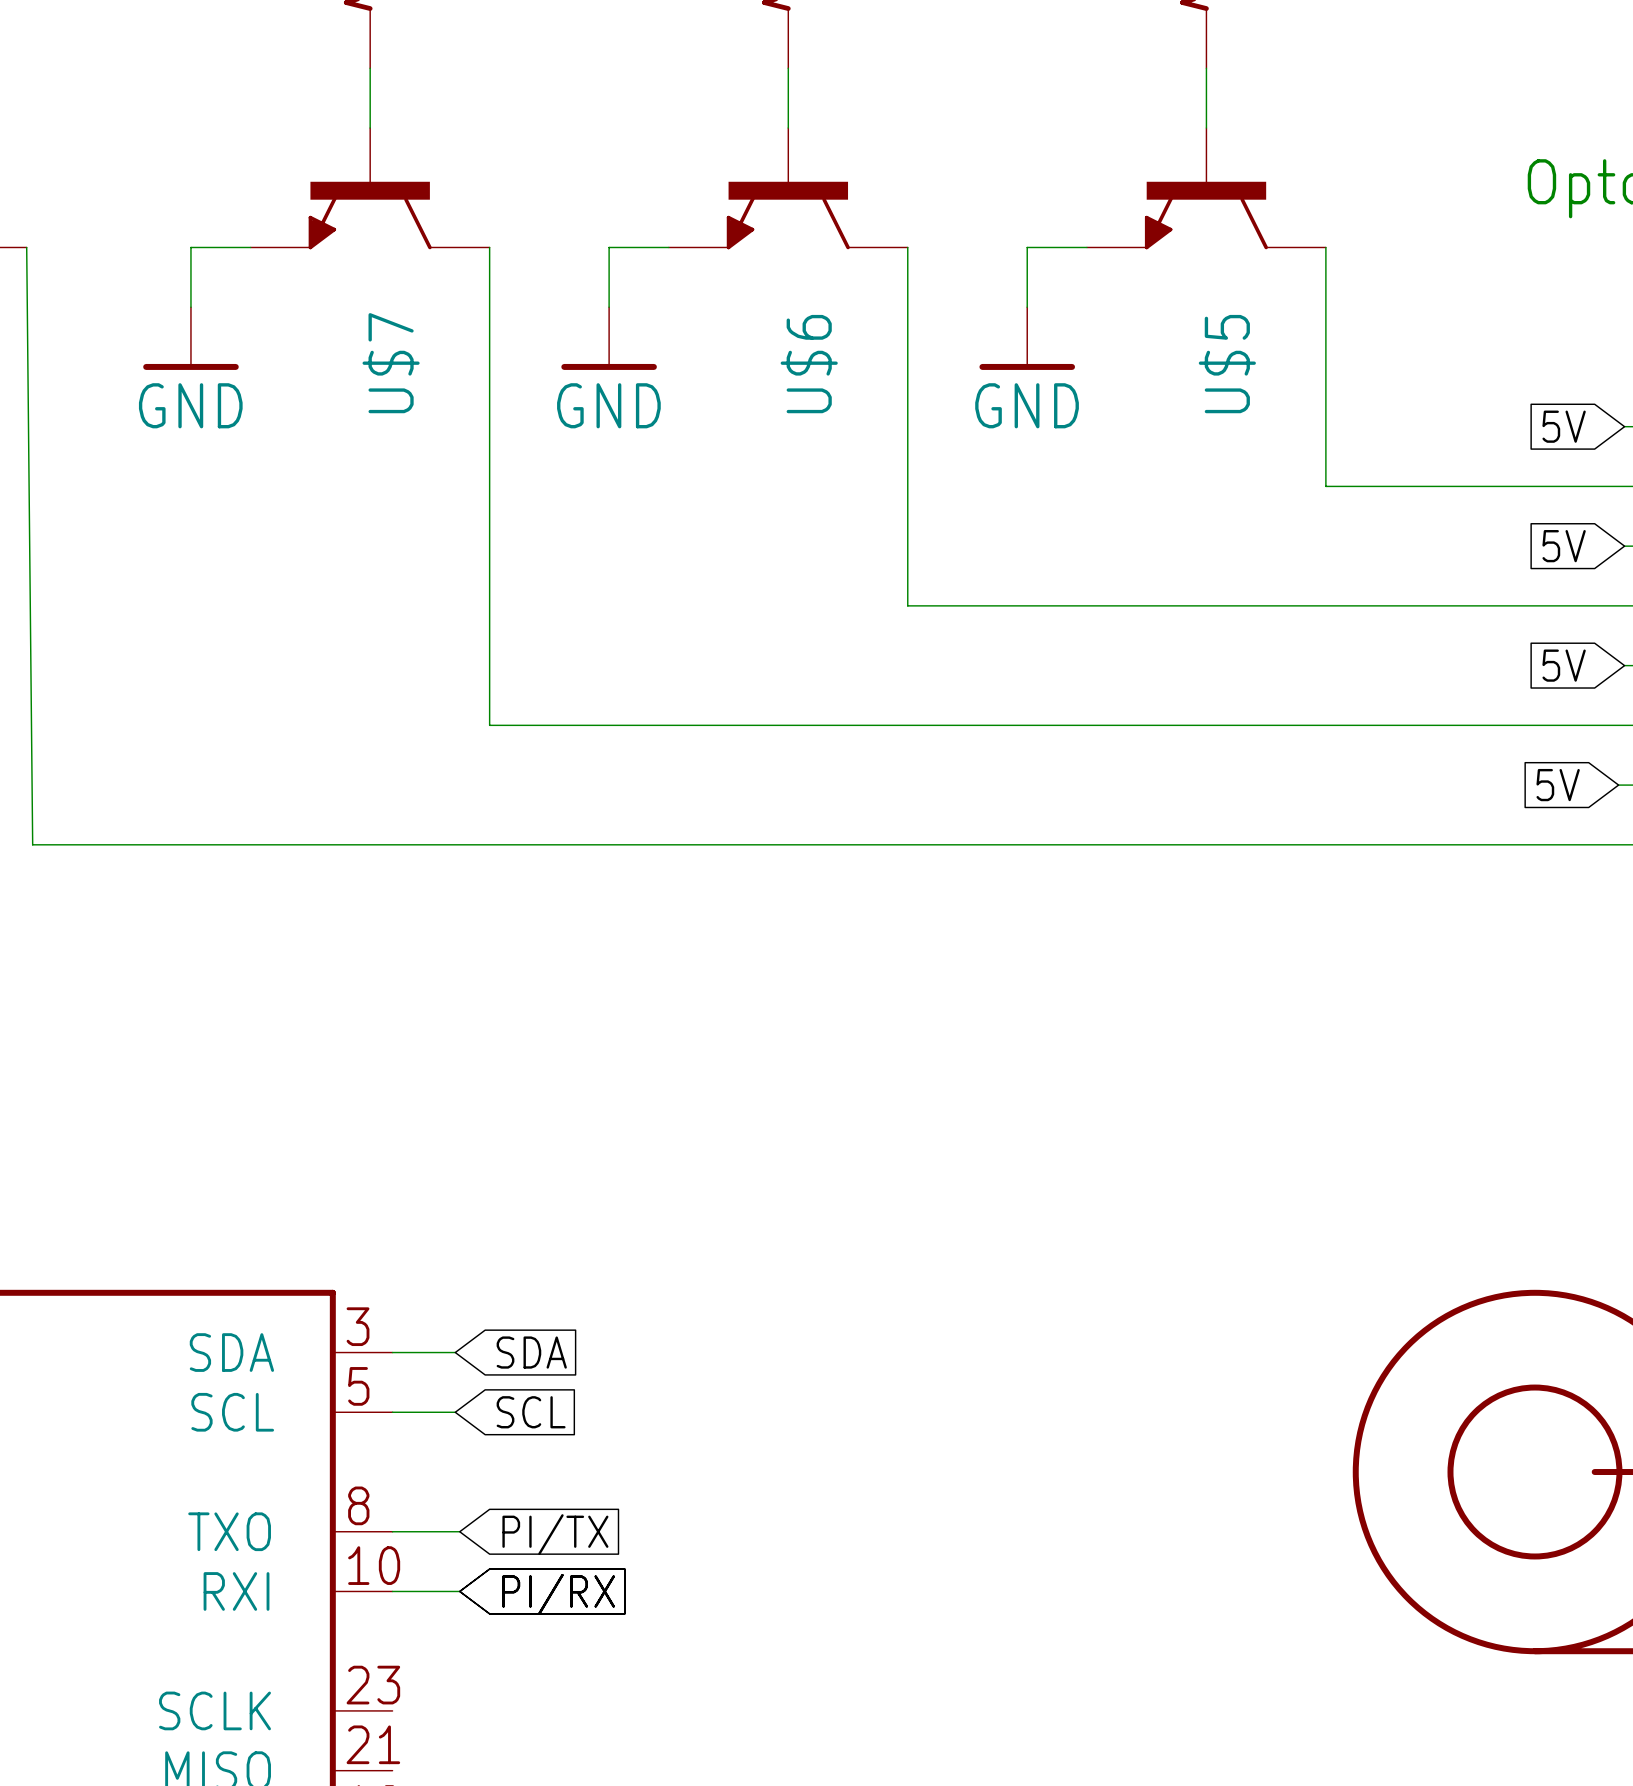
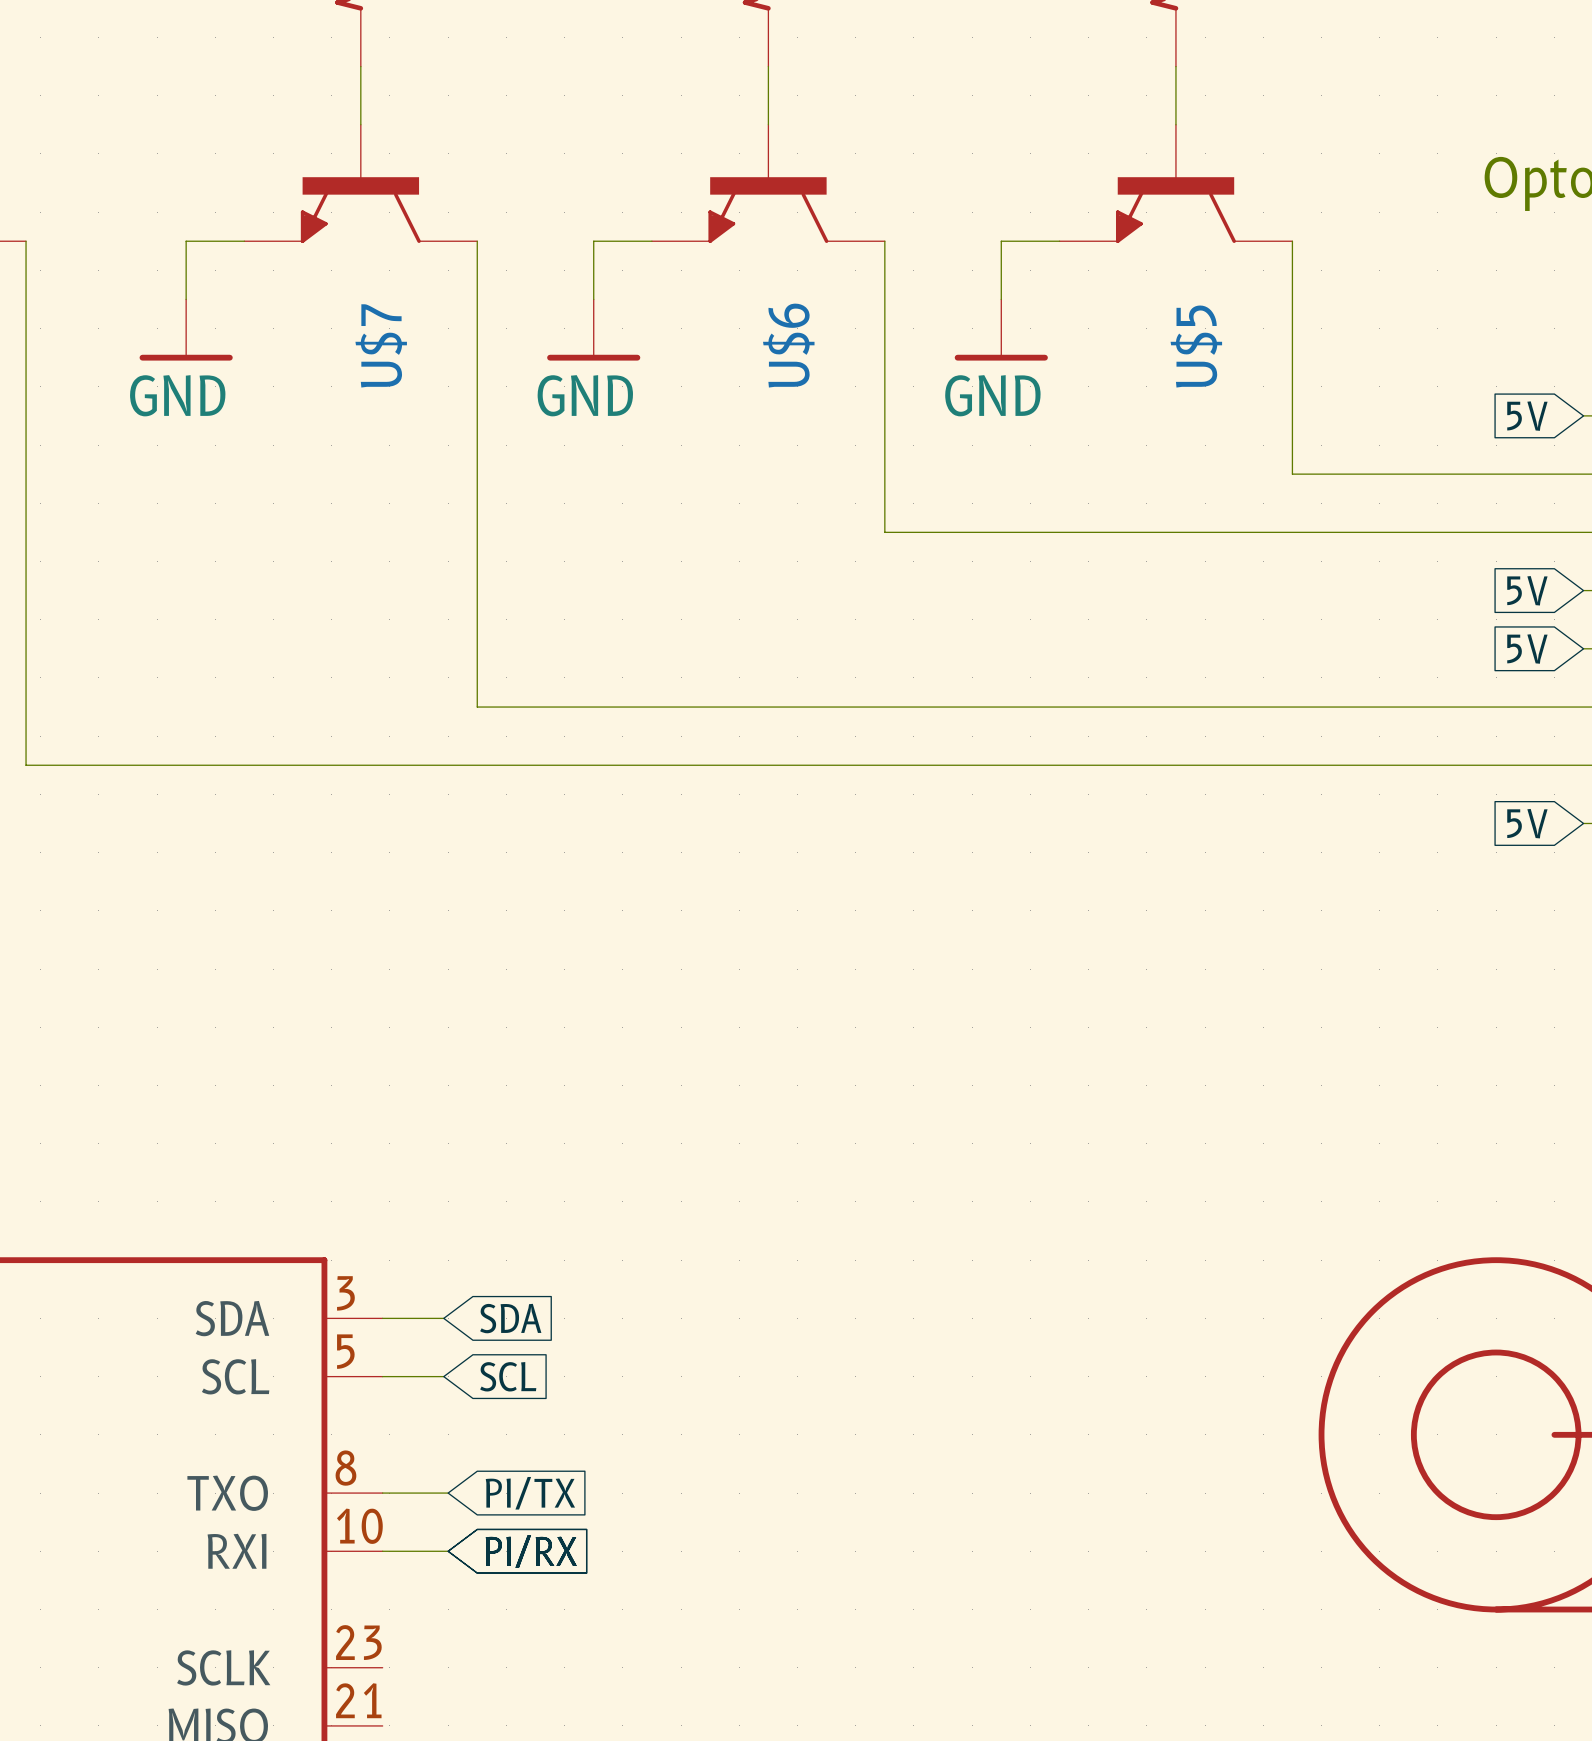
wire: (26, 247) (32, 844) (1624, 844) -> (26, 241) (26, 765) (1577, 765)
wire: (907, 546) (907, 605) (1624, 605) -> (884, 532) (1583, 532)
global label position: 5V (1564, 546) -> 5V (1527, 590)
global label position: 5V (1558, 785) -> 5V (1527, 823)

